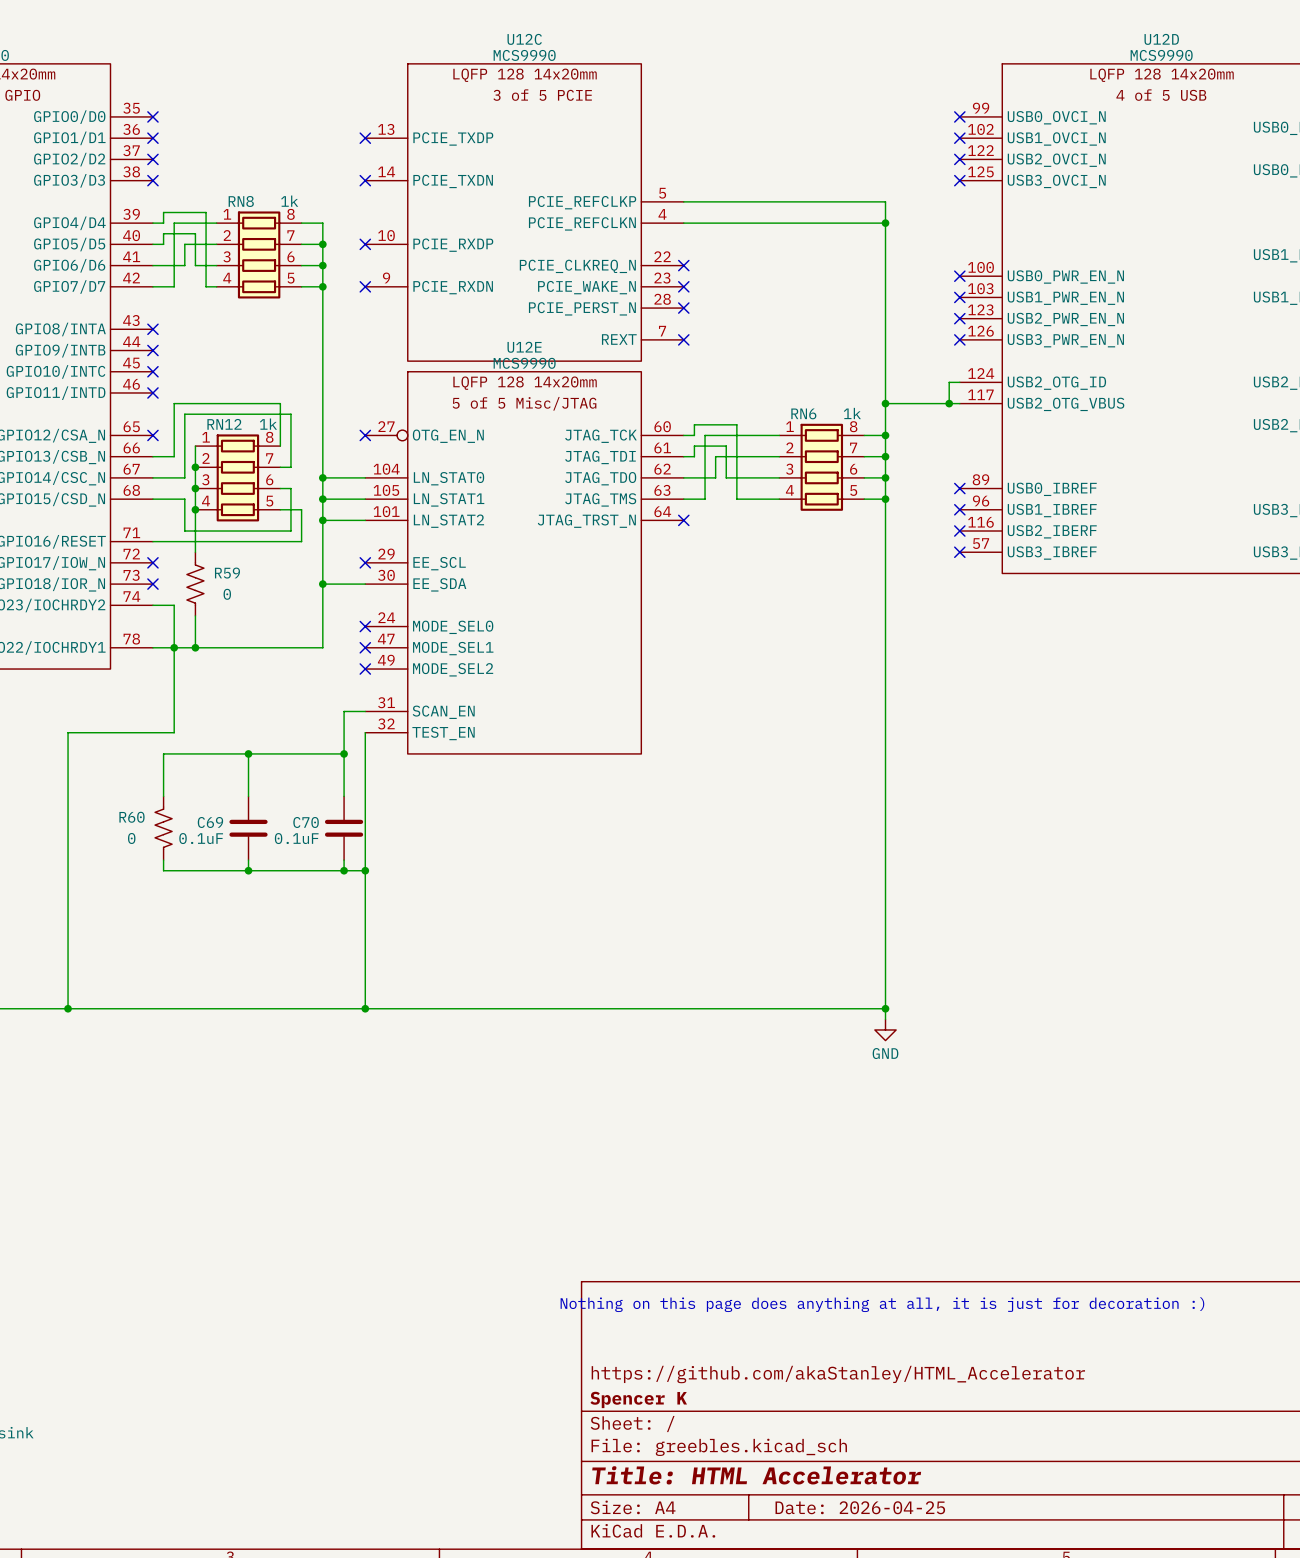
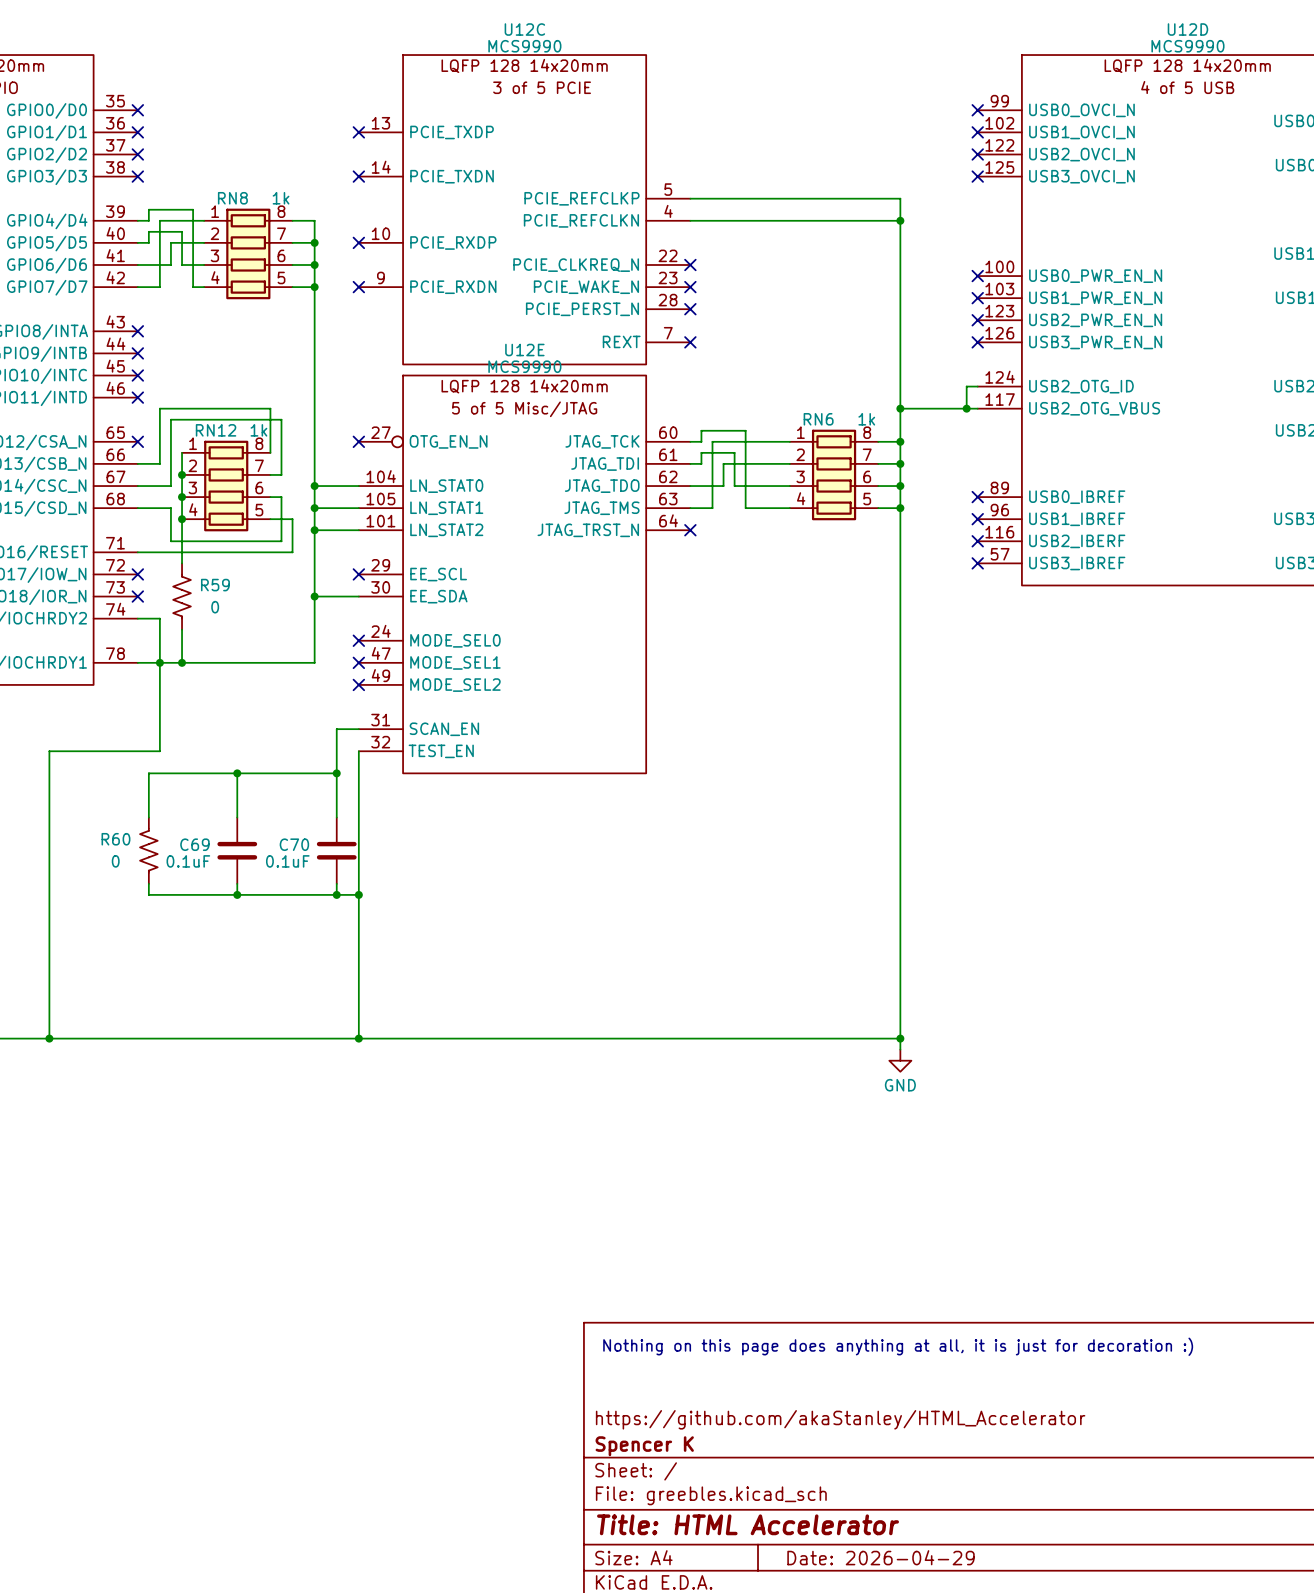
title block: Date: 2026-04-25 (860, 1507) -> Date: 2026-04-29 (881, 1557)

